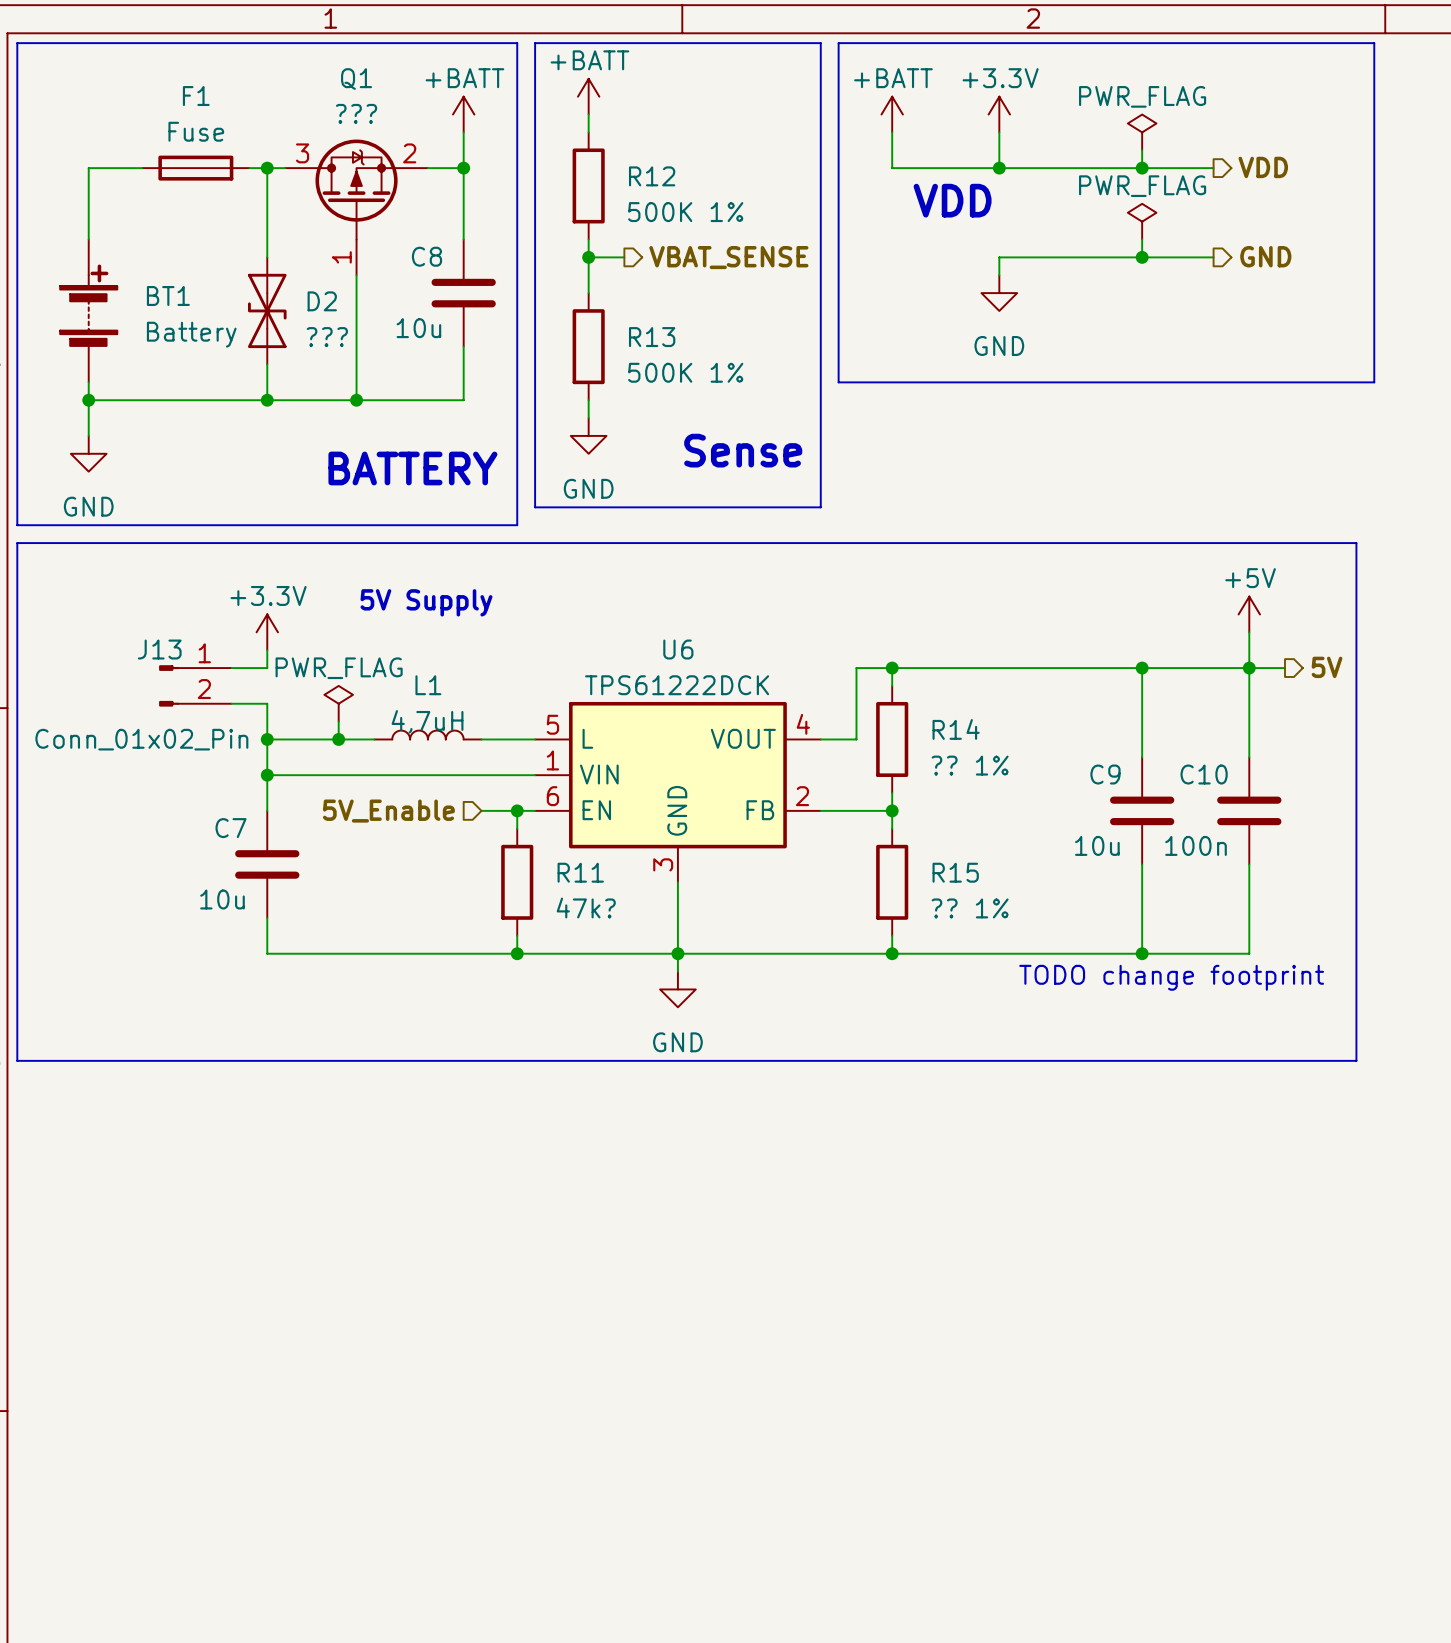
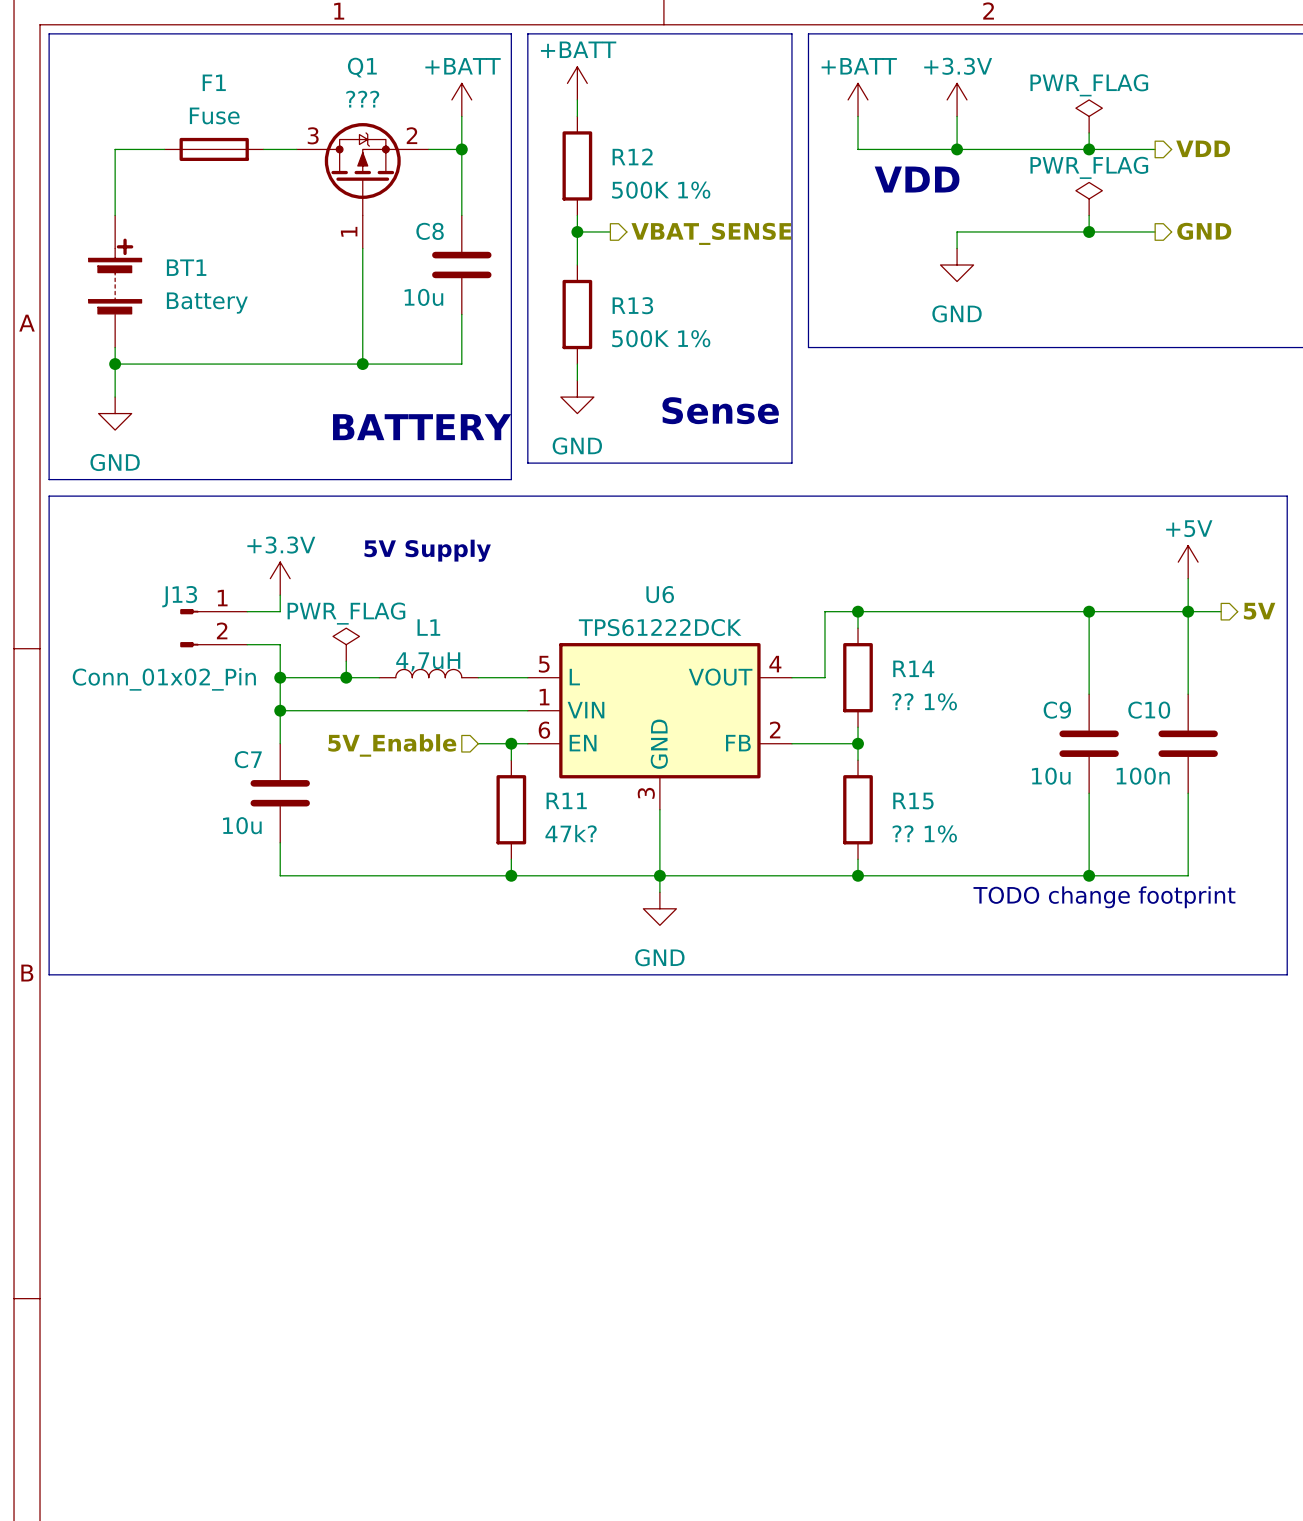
wire: (267, 168) (267, 257) -> none
junction: (267, 168) -> none
D2: ??? (267, 310) -> none
wire: (267, 364) (267, 400) -> none
junction: (267, 400) -> none

